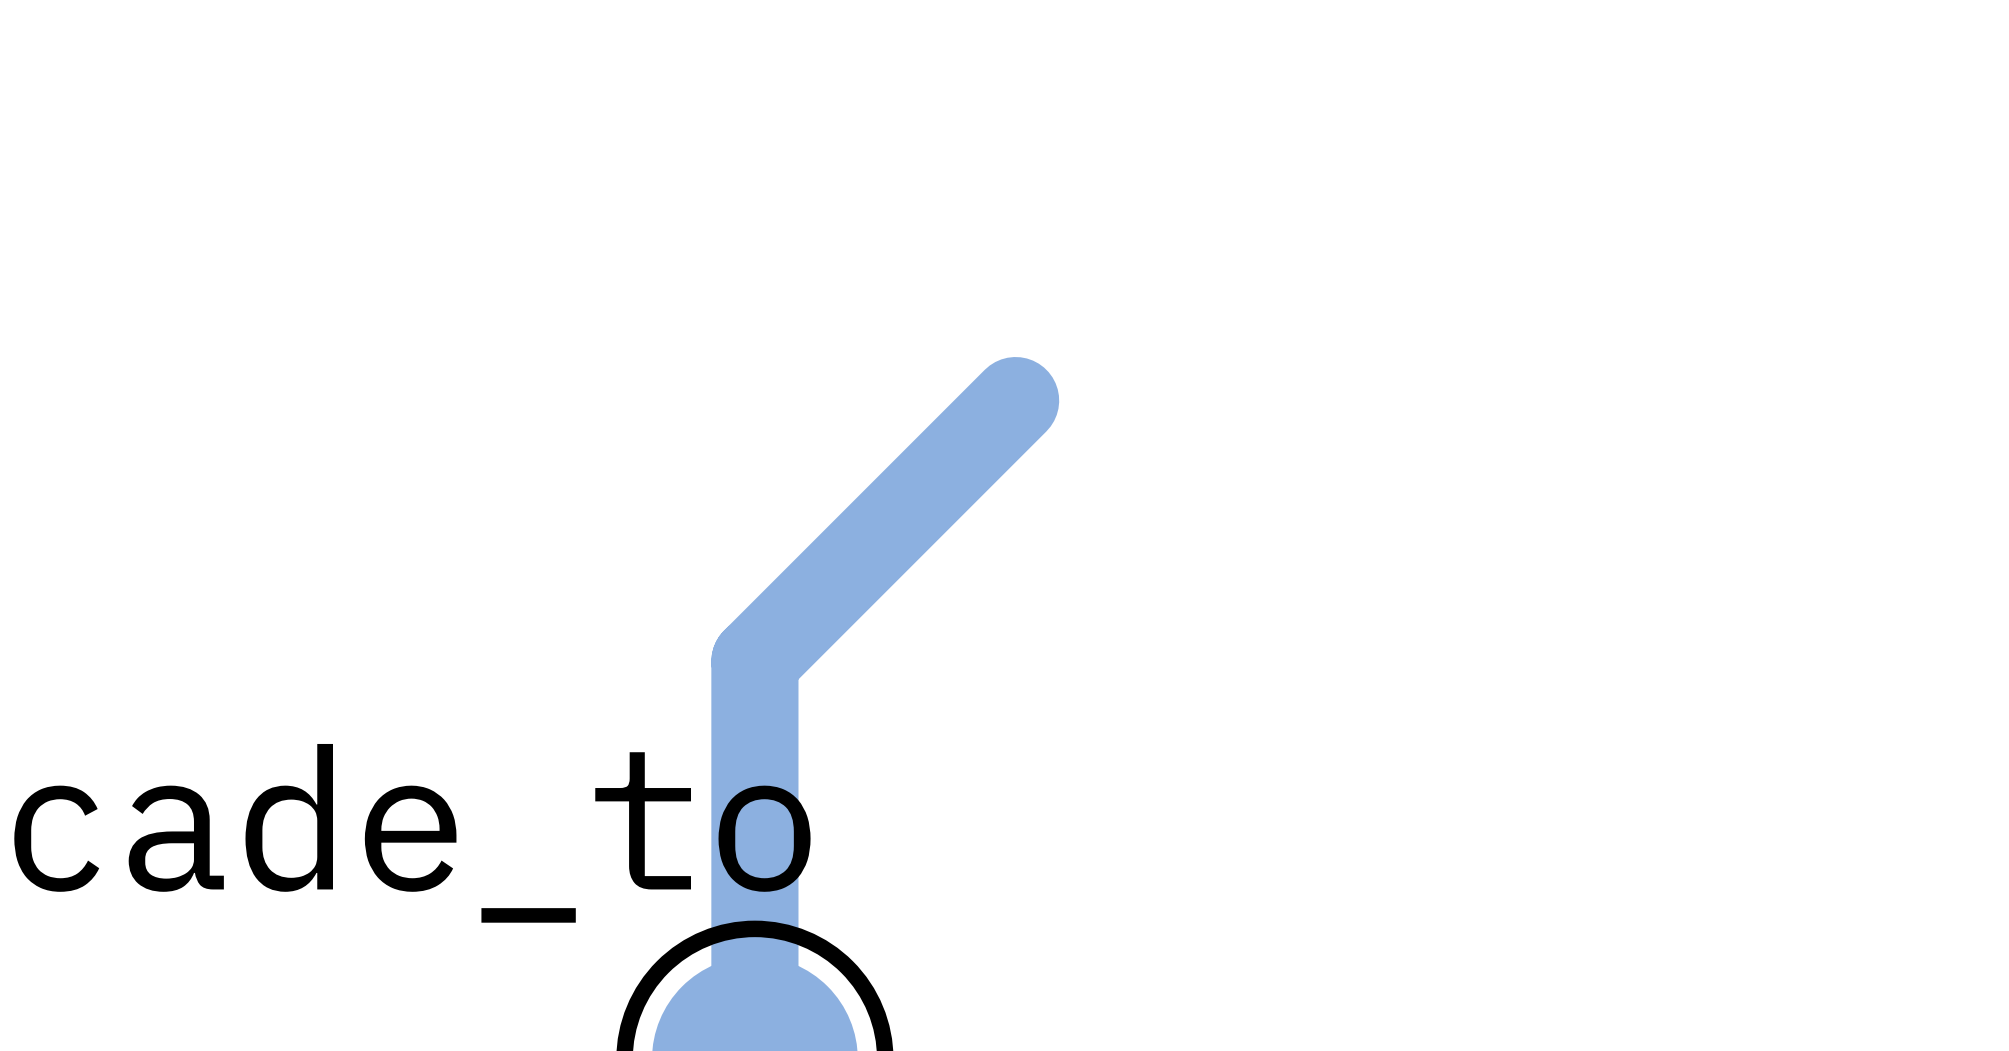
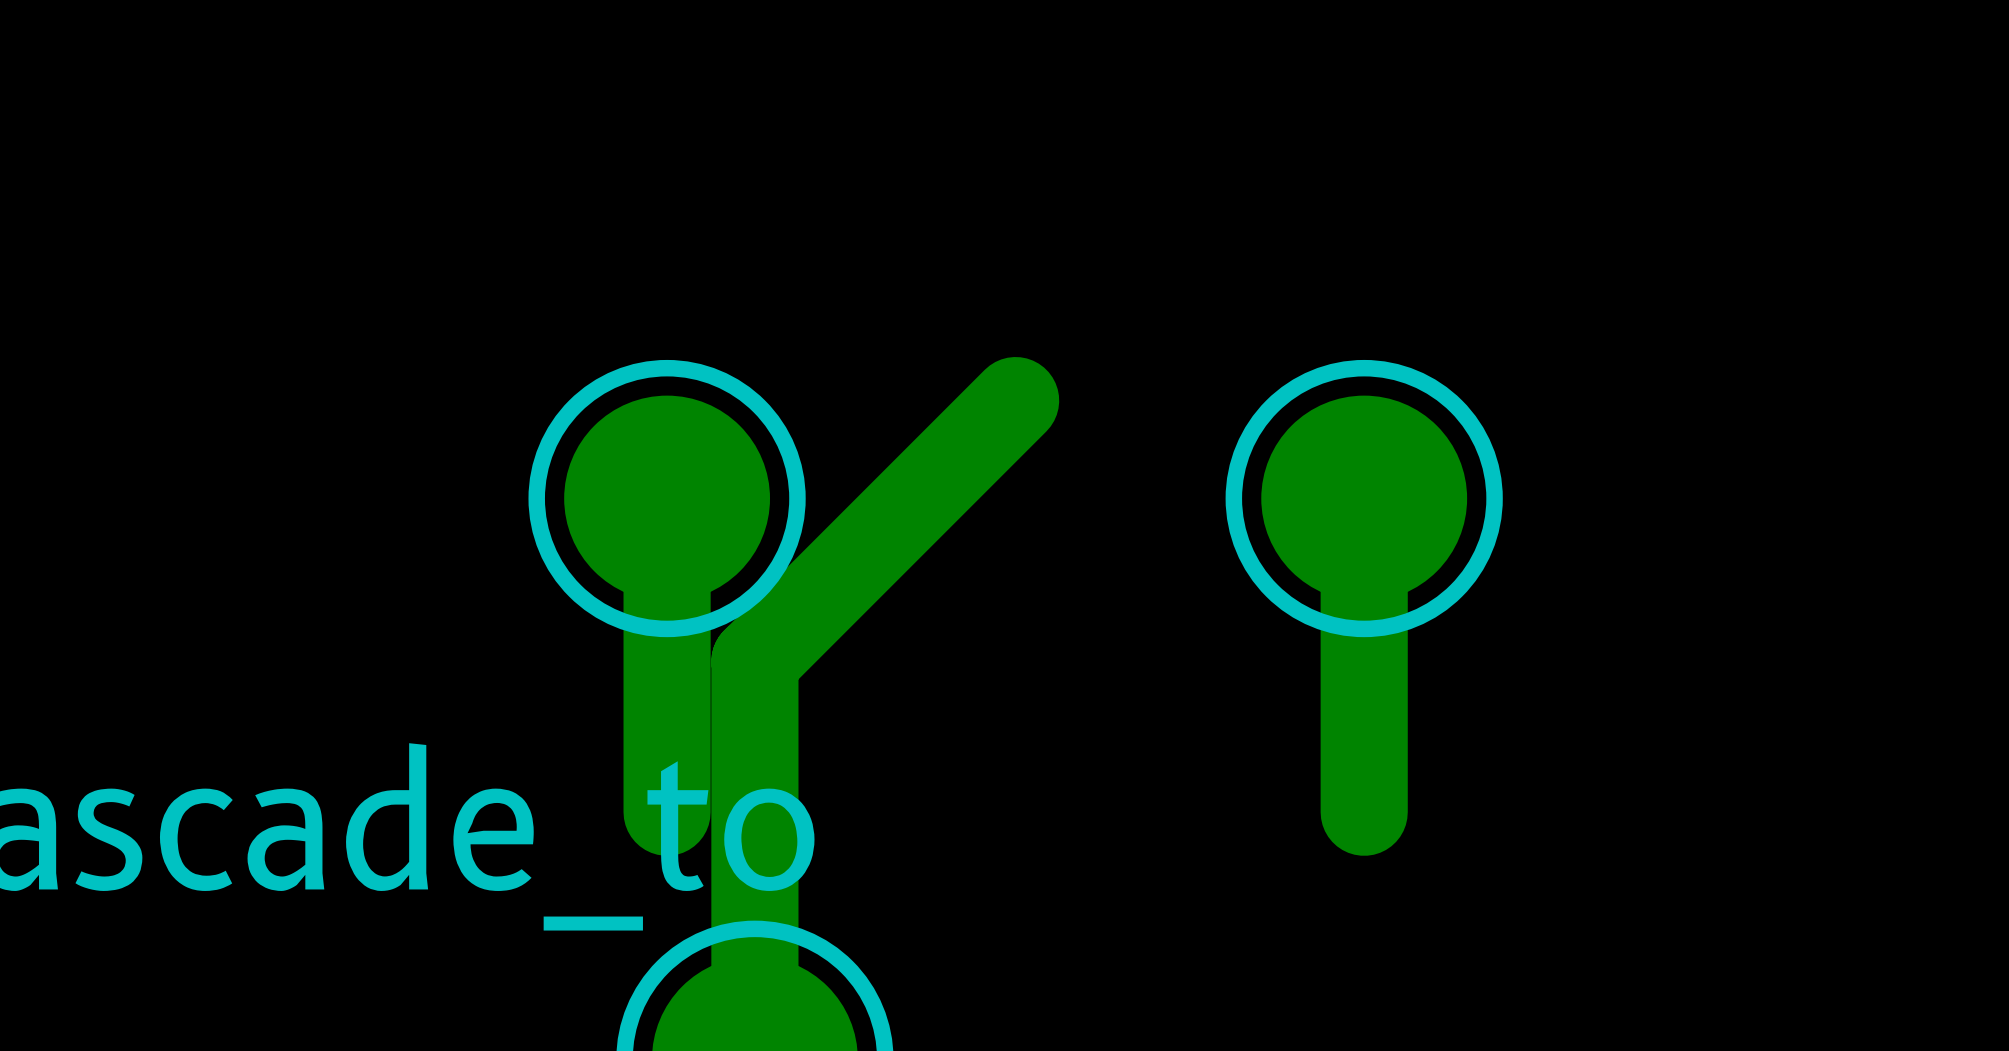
bottom track: none -> (667, 498) (667, 812)
part: none -> (667, 498)
bottom track: none -> (1364, 498) (1364, 812)
part: none -> (1364, 498)

